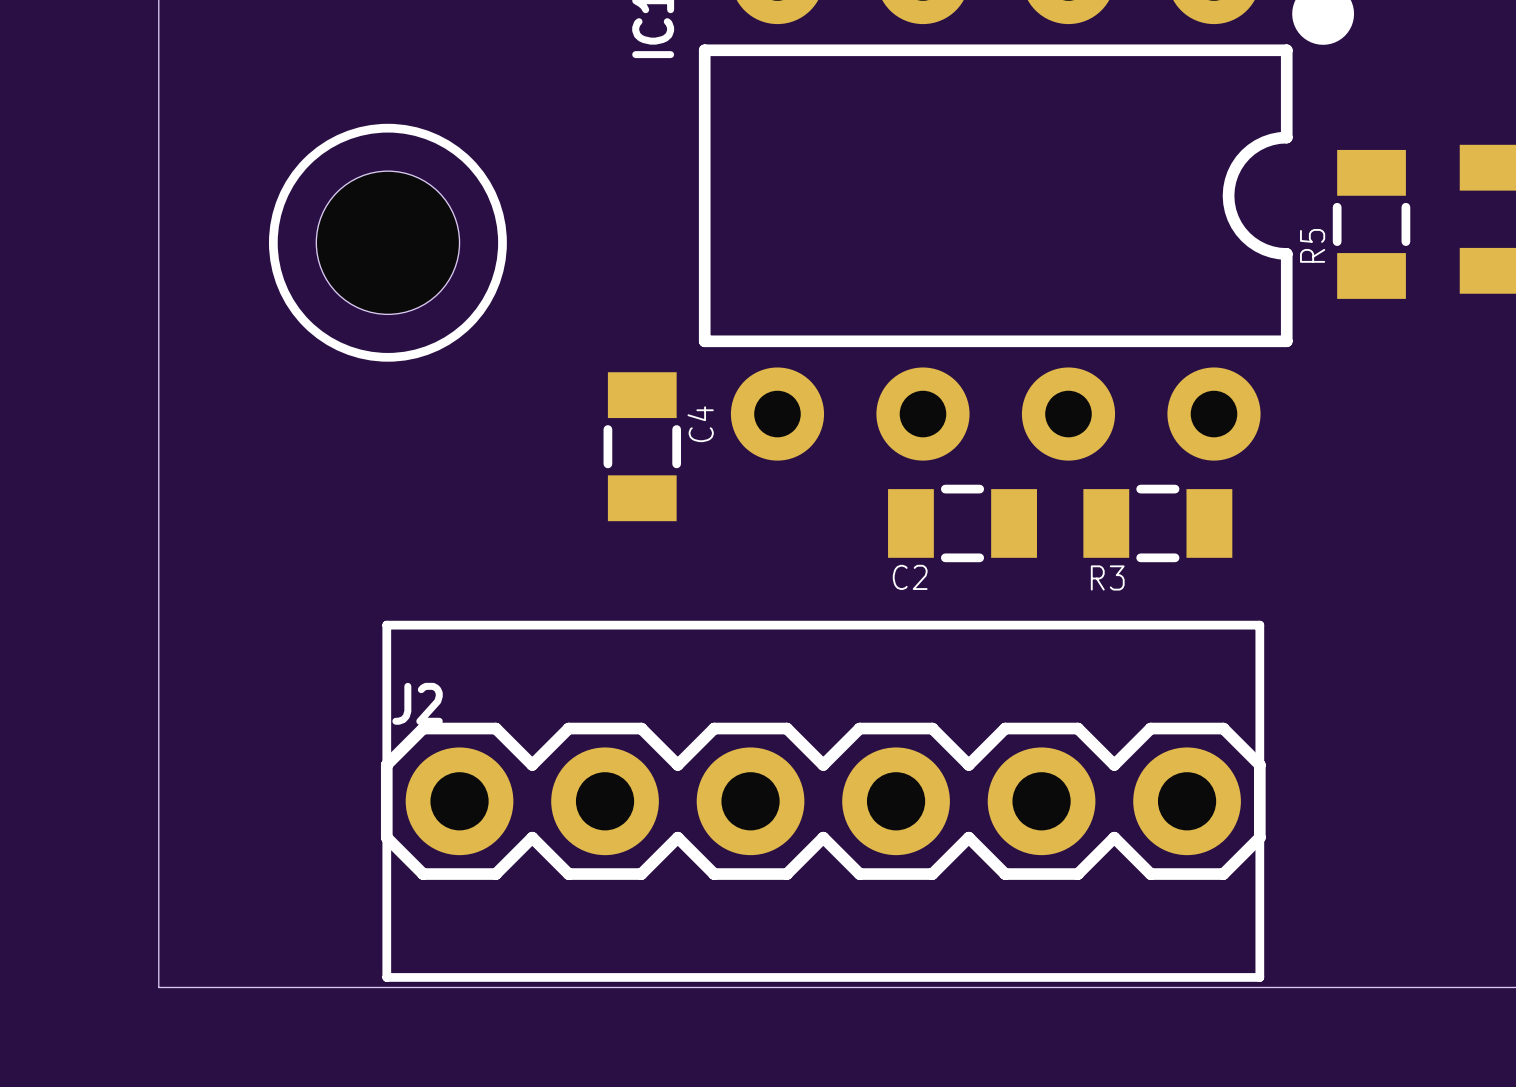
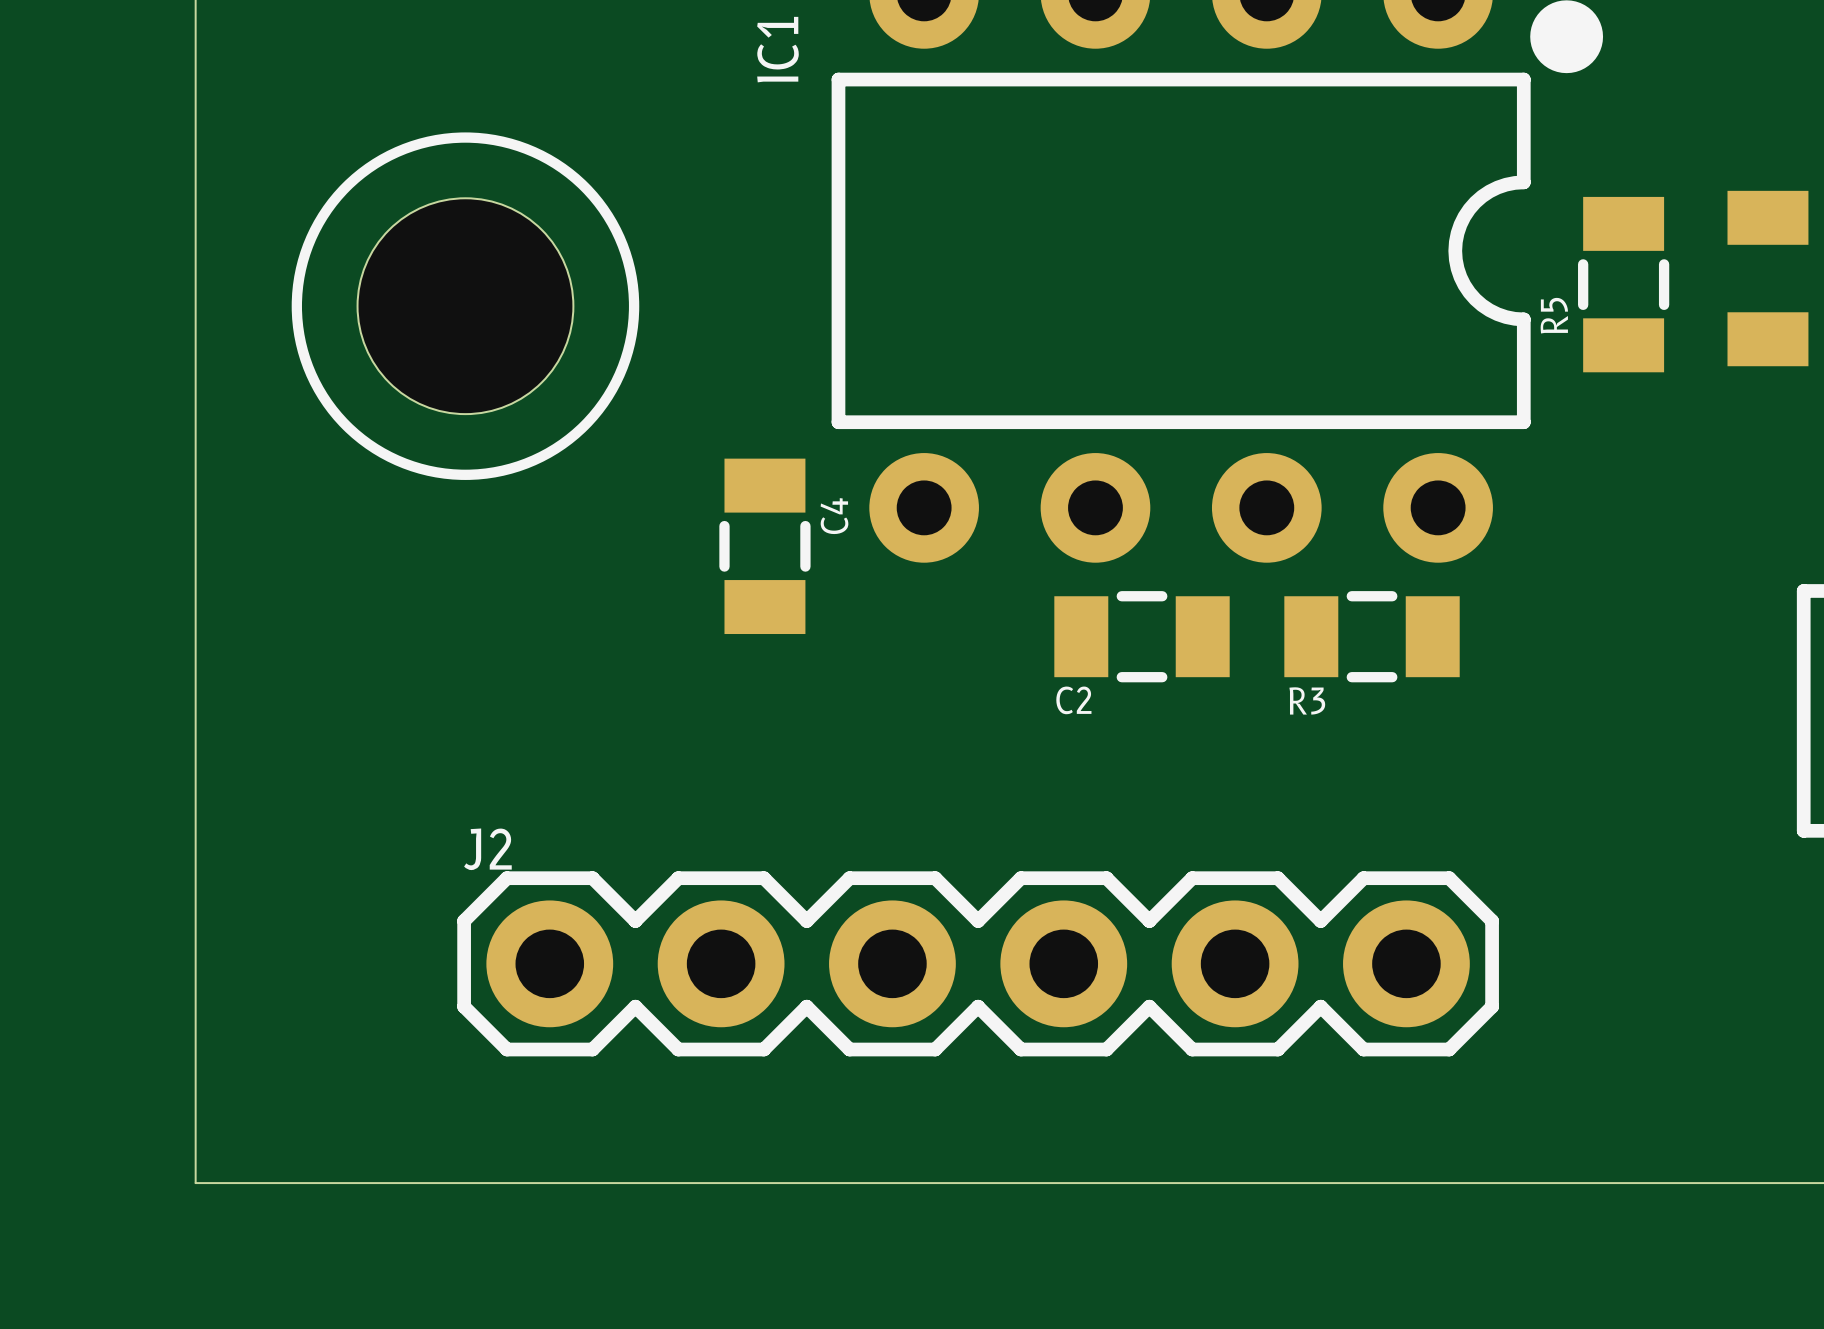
drawing shape: [268, 123, 507, 362] -> [291, 132, 640, 480]
hole size: [316, 171, 460, 315] -> [357, 198, 574, 415]
line: (386, 625) (386, 977) (1259, 977) (1259, 625) (386, 625) -> none

